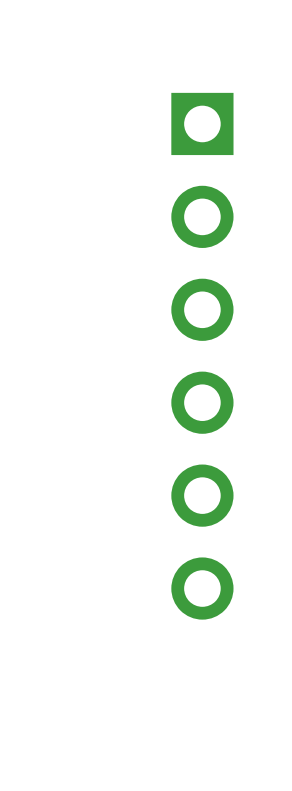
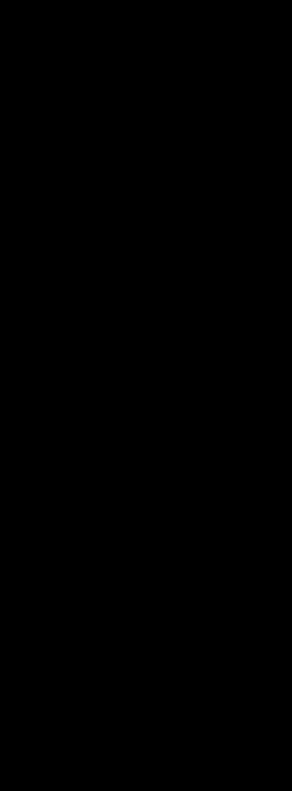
part: (202, 356) -> none

